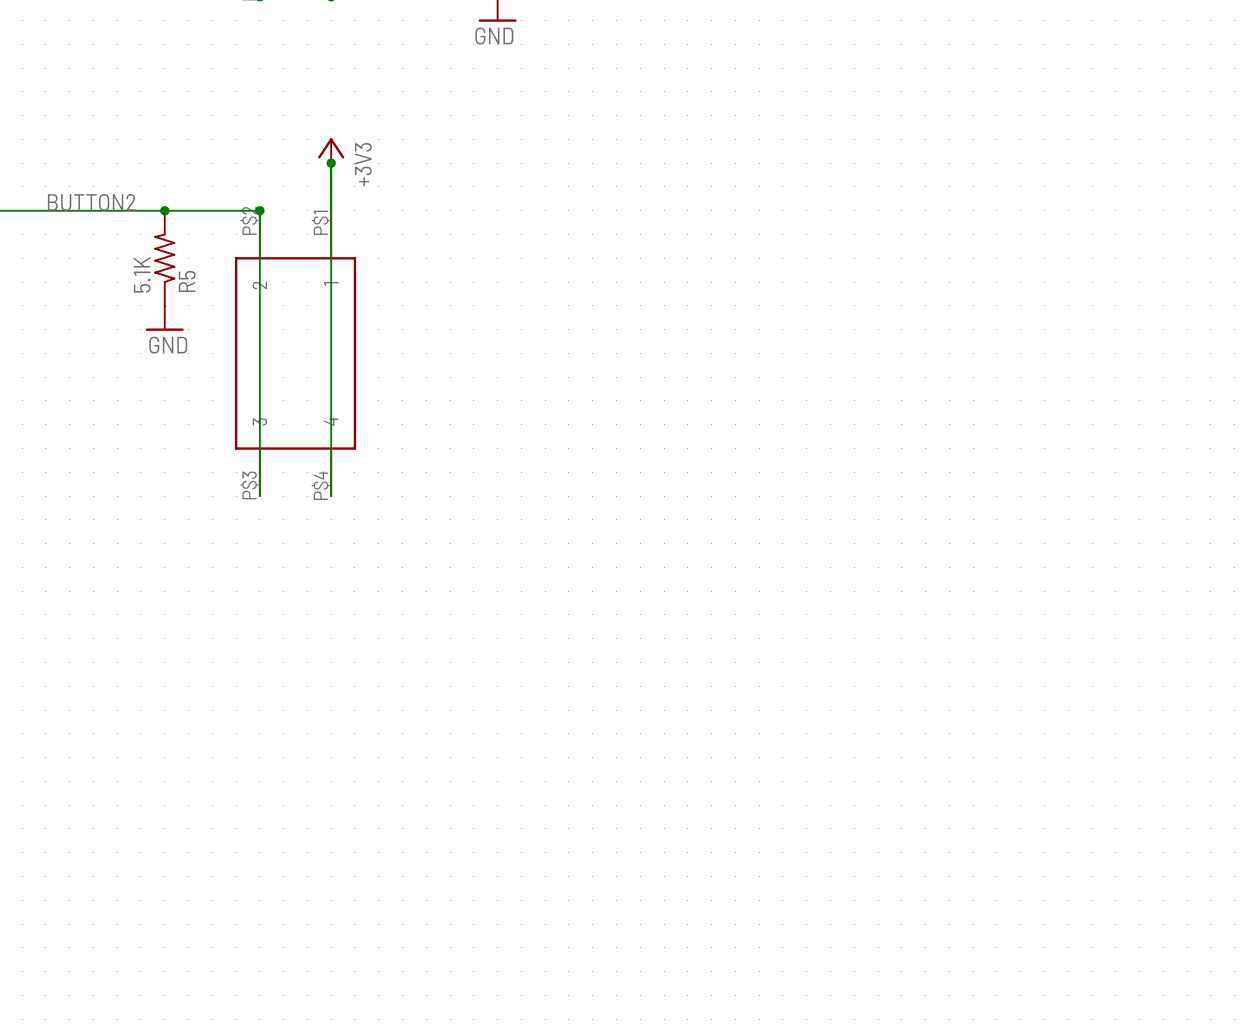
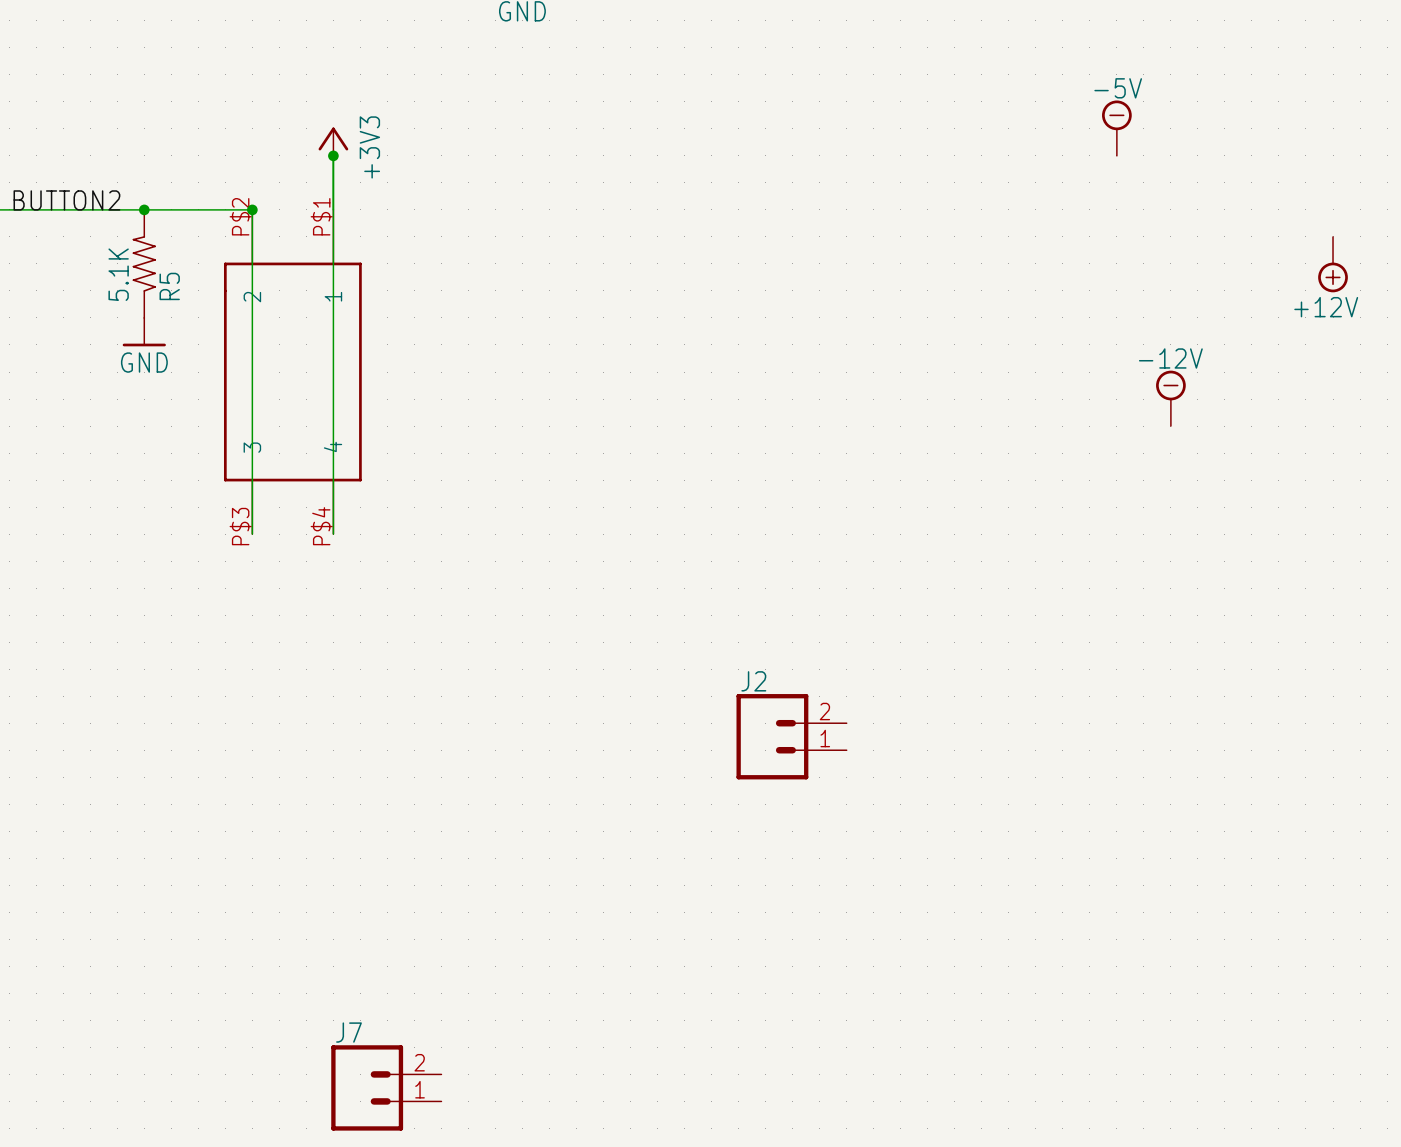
power symbol: none -> -5V (1116, 128)
power symbol: none -> +12V (1333, 264)
power symbol: none -> -12V (1170, 398)
J2: none -> (791, 736)
J7: none -> (386, 1087)

